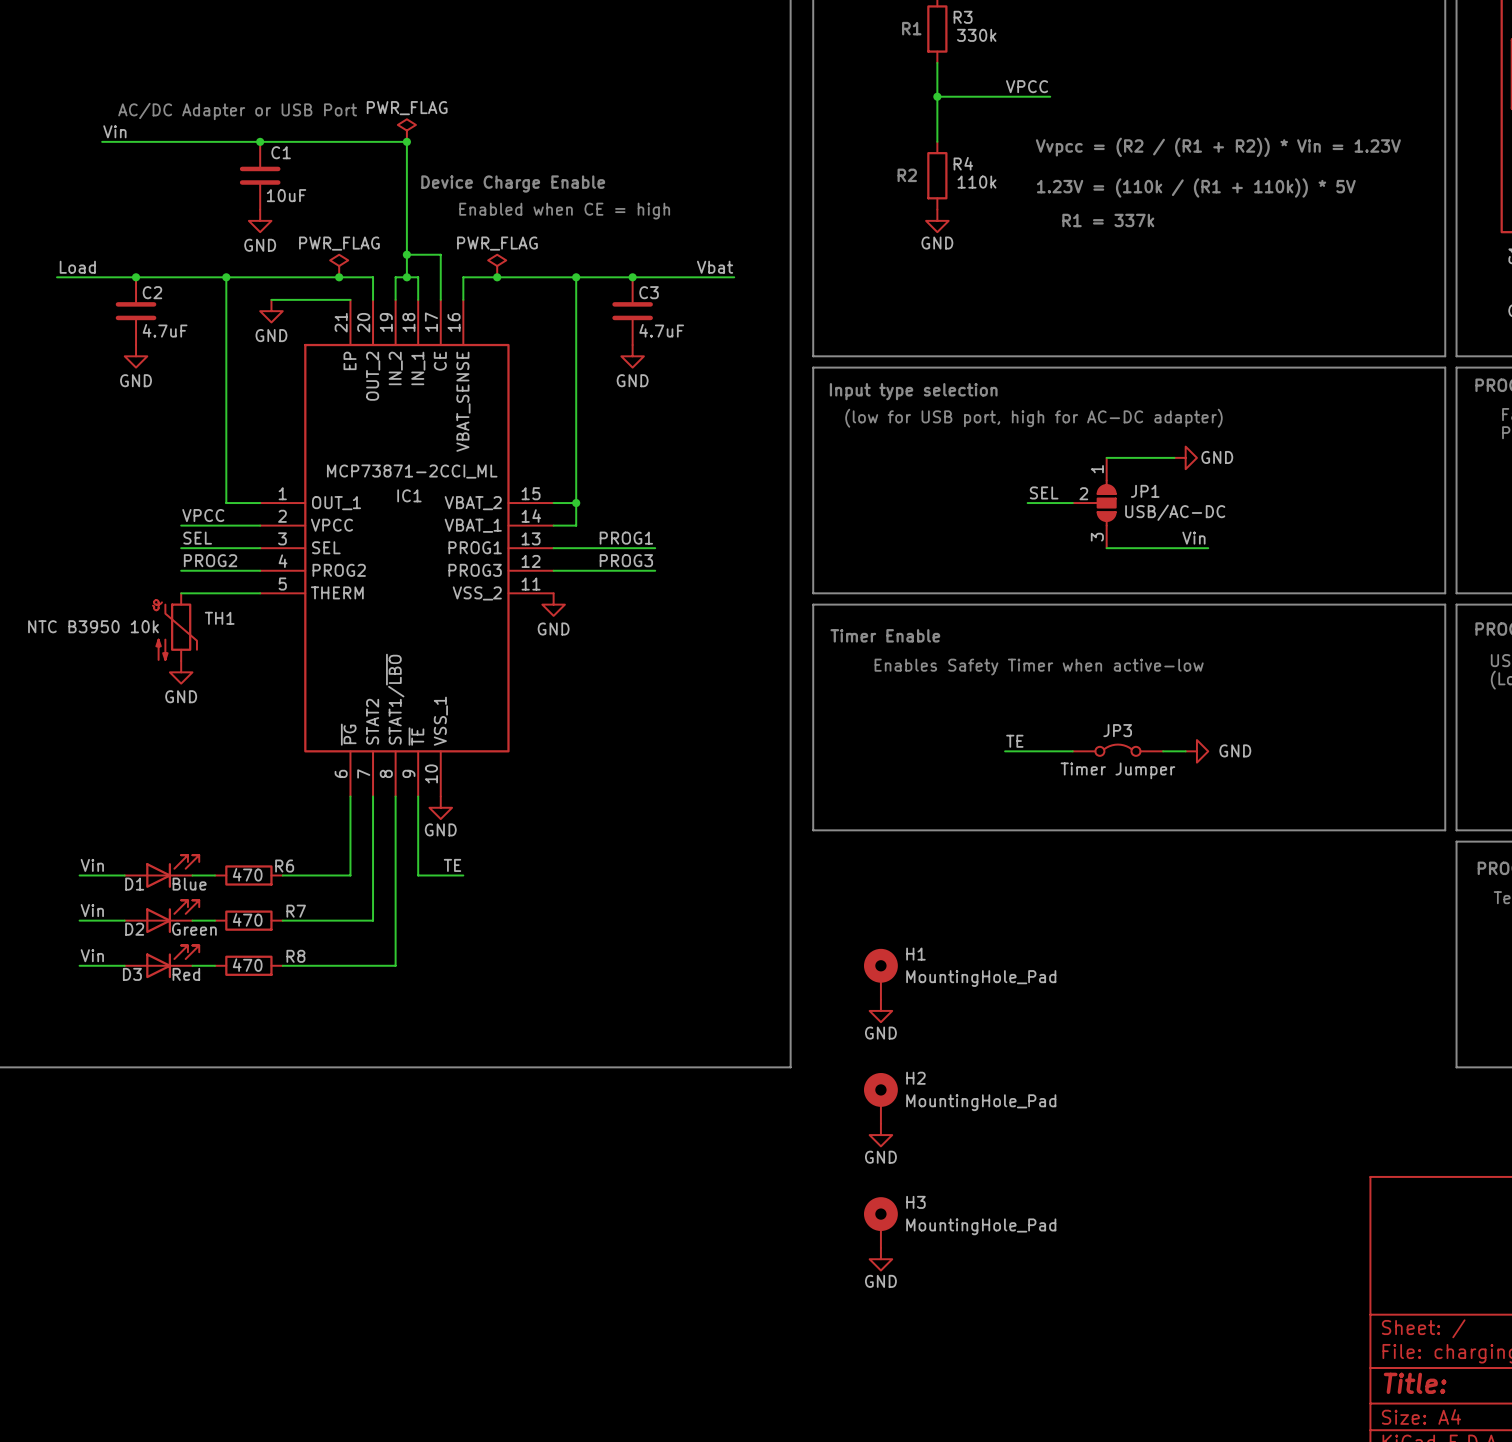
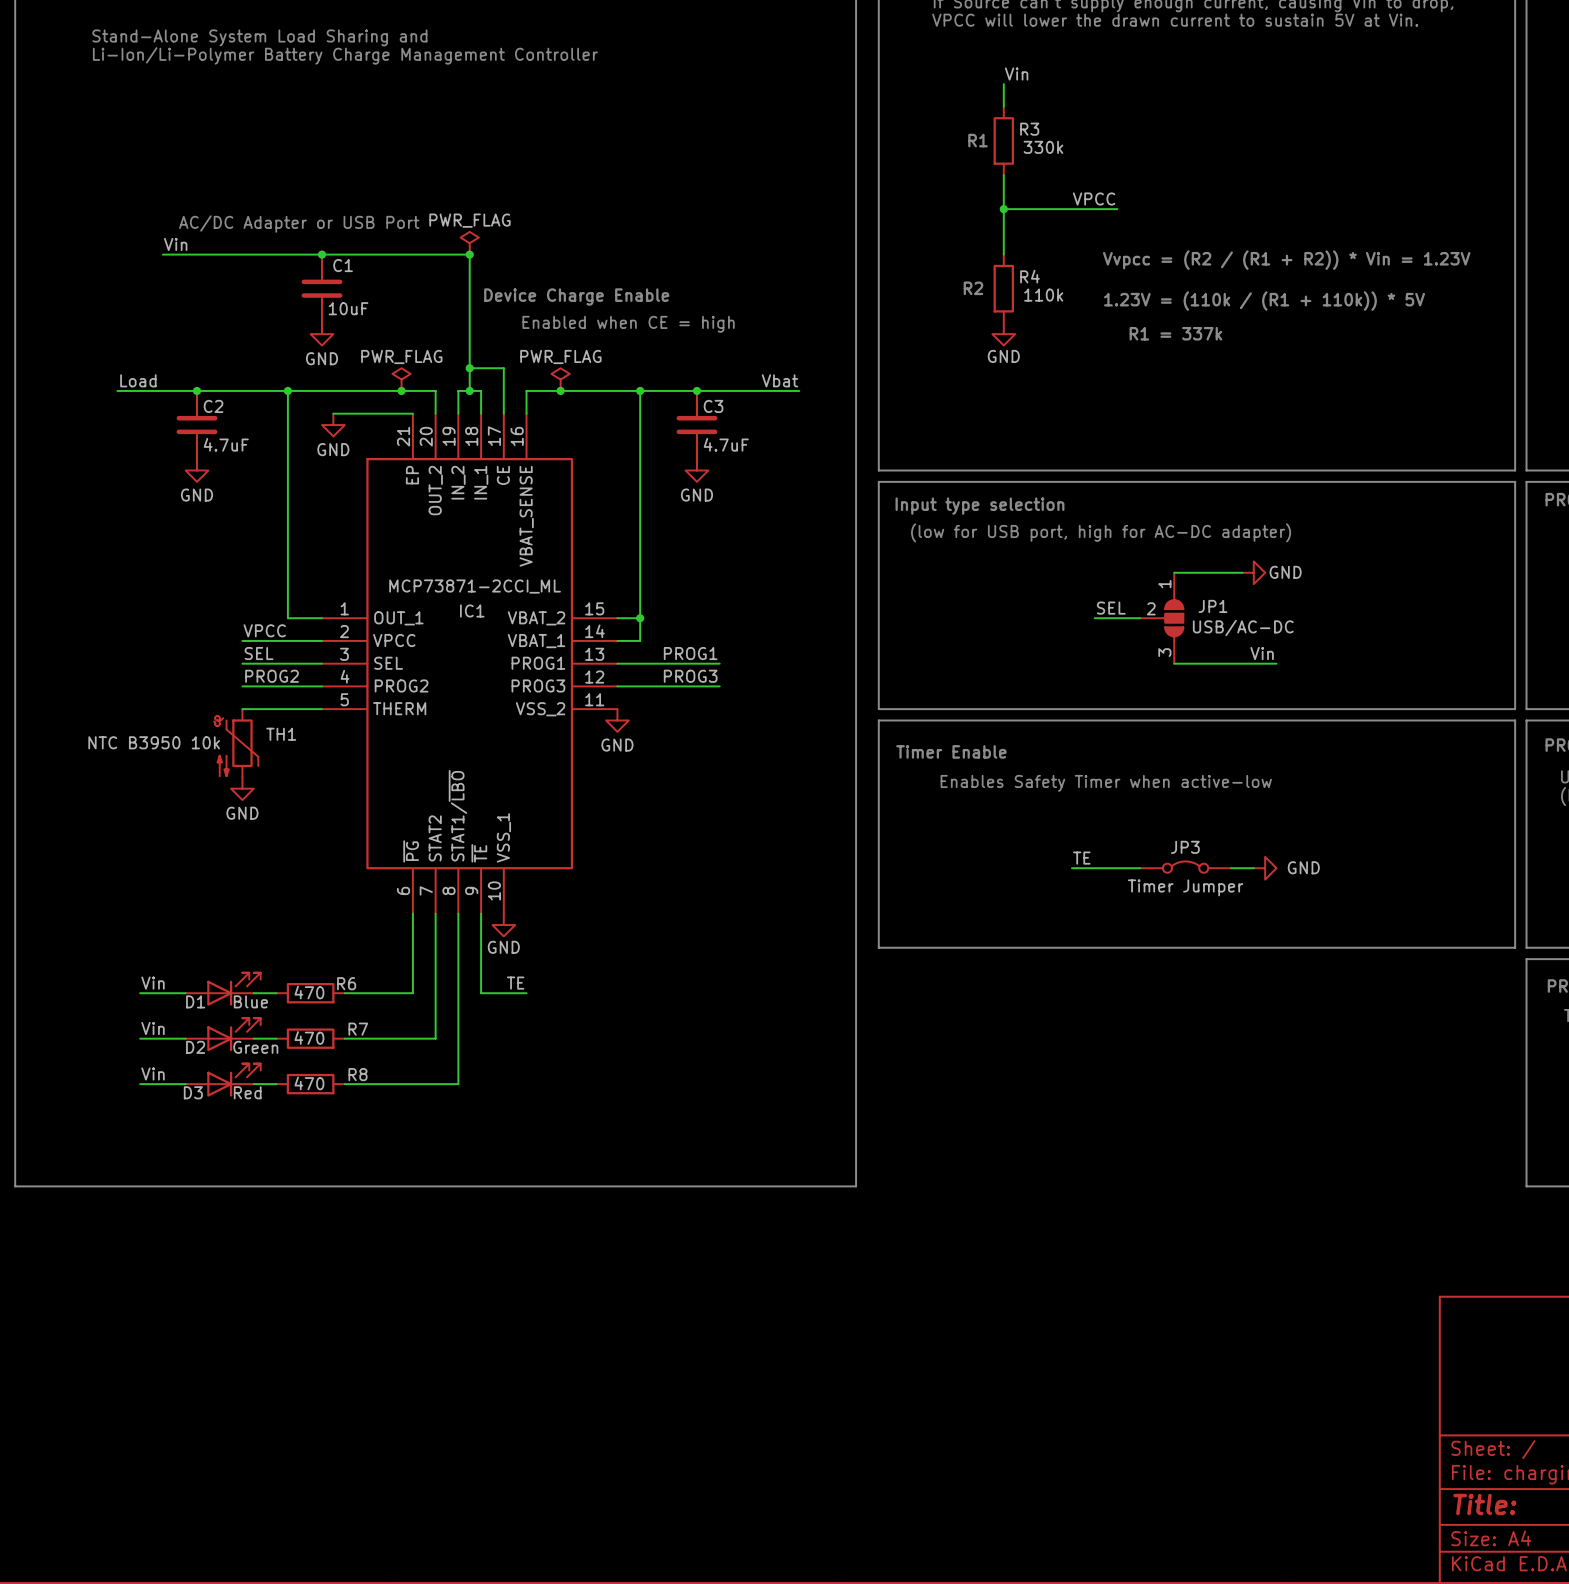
H1: MountingHole_Pad (880, 974) -> none
power symbol: GND (880, 1010) -> none
H2: MountingHole_Pad (880, 1098) -> none
power symbol: GND (880, 1135) -> none
H3: MountingHole_Pad (880, 1222) -> none
power symbol: GND (880, 1259) -> none

